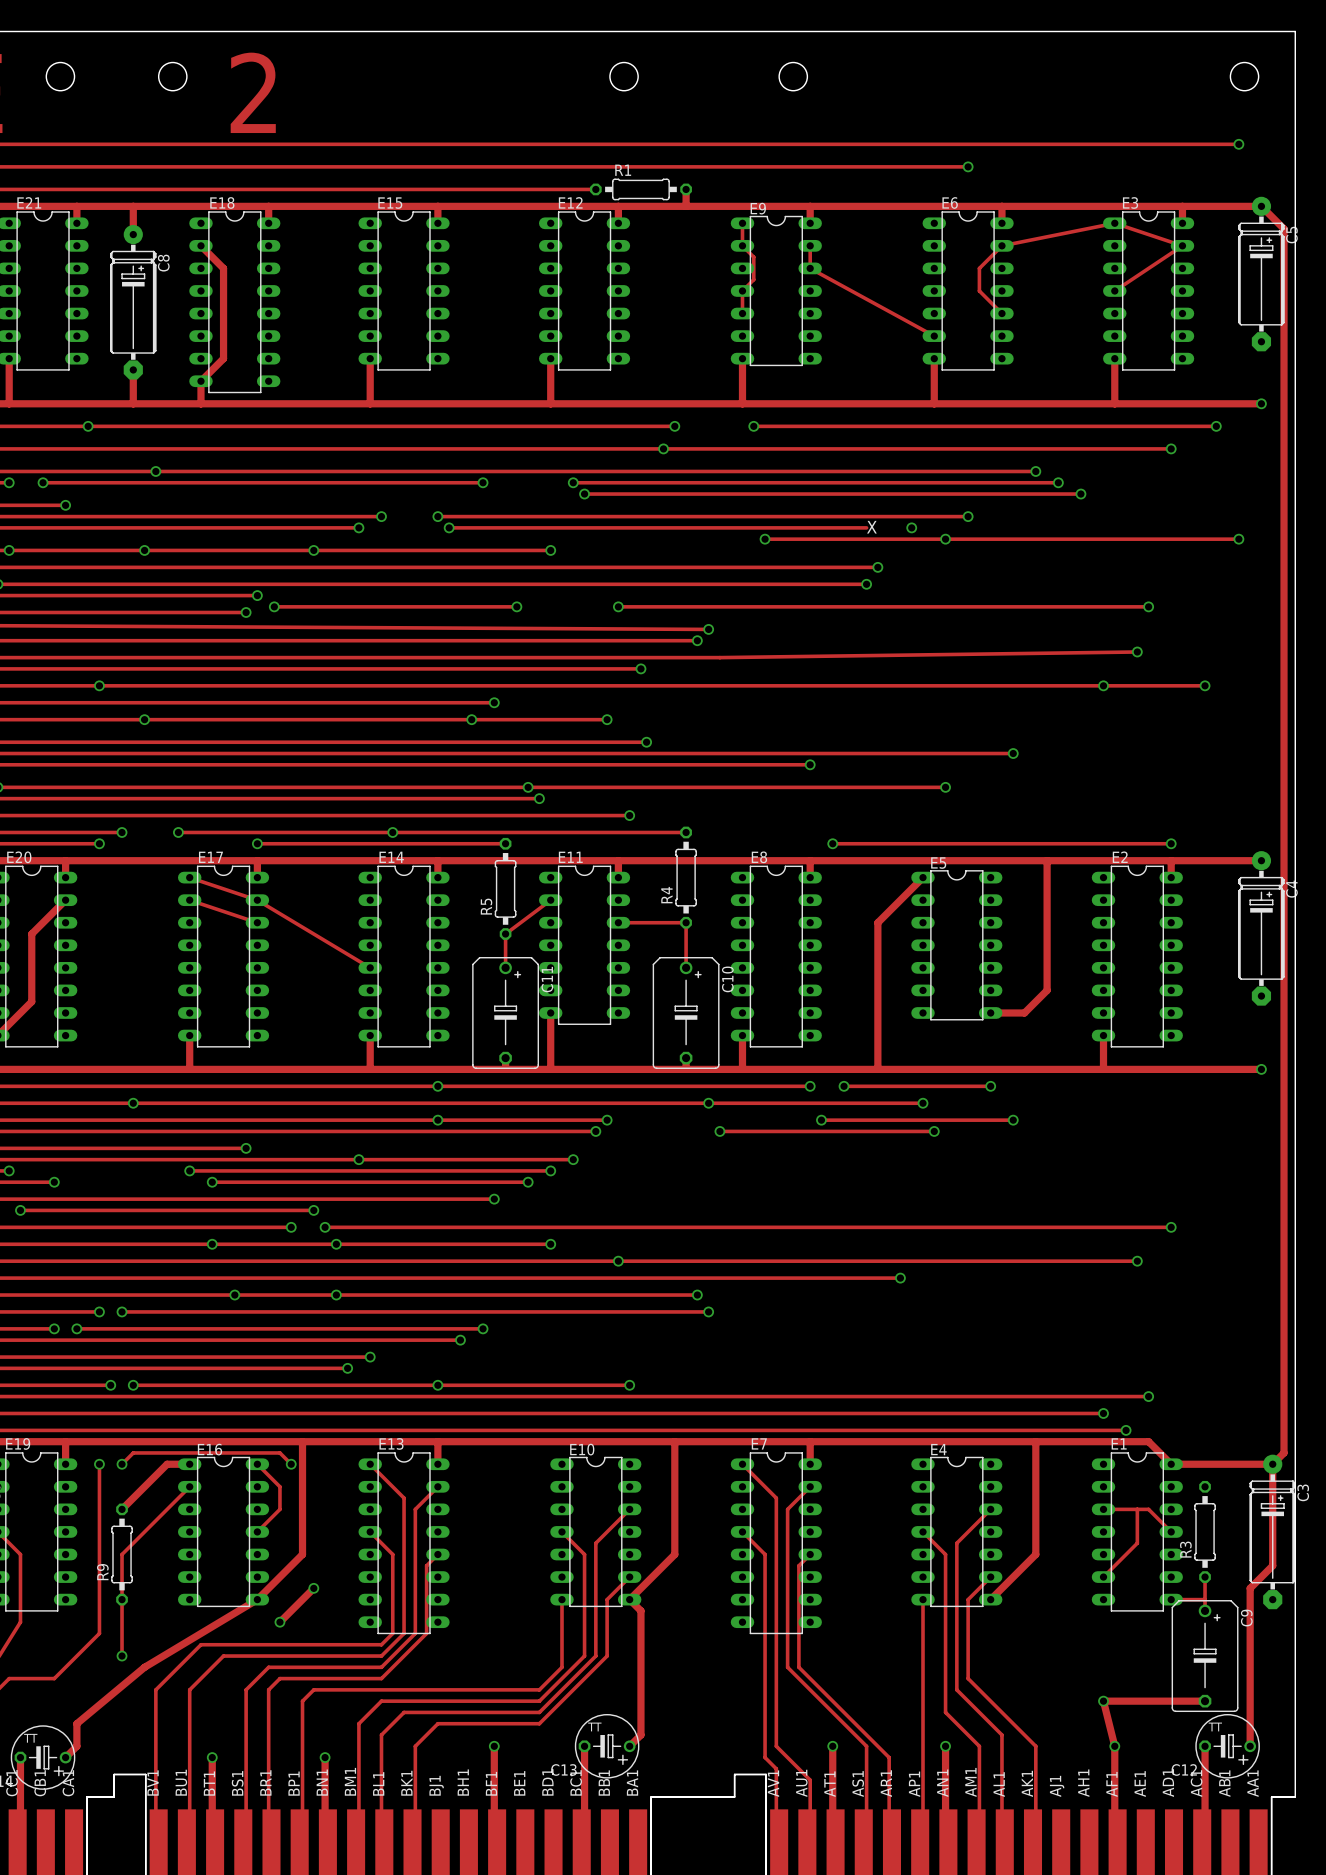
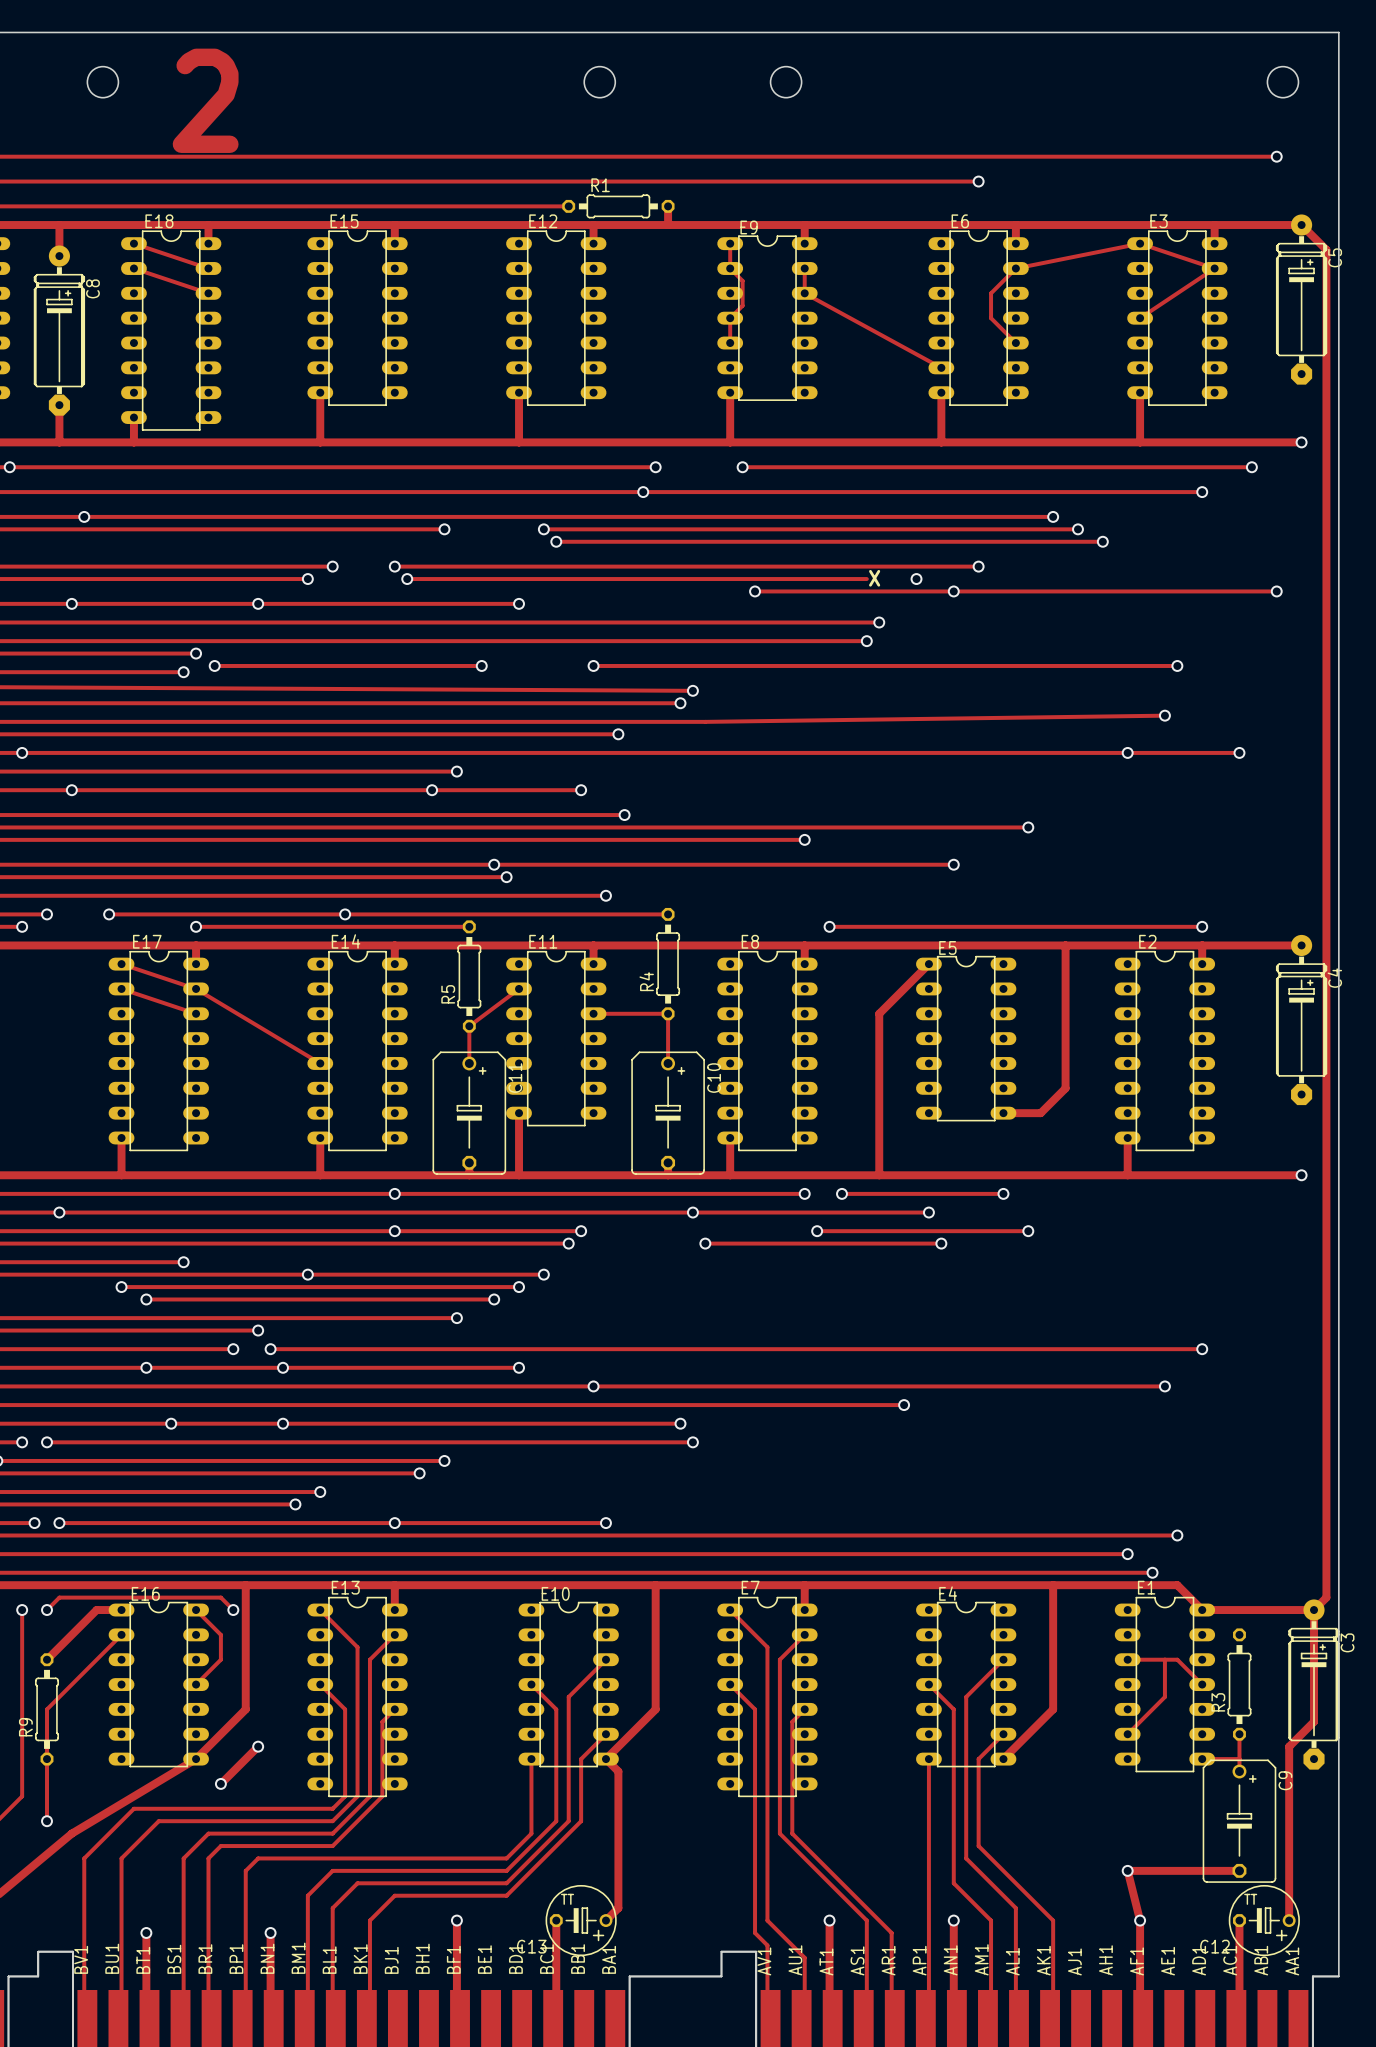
track: none -> (133, 243) (208, 268)
track: (200, 245) (223, 268) (223, 358) (200, 381) -> (133, 268) (208, 293)

